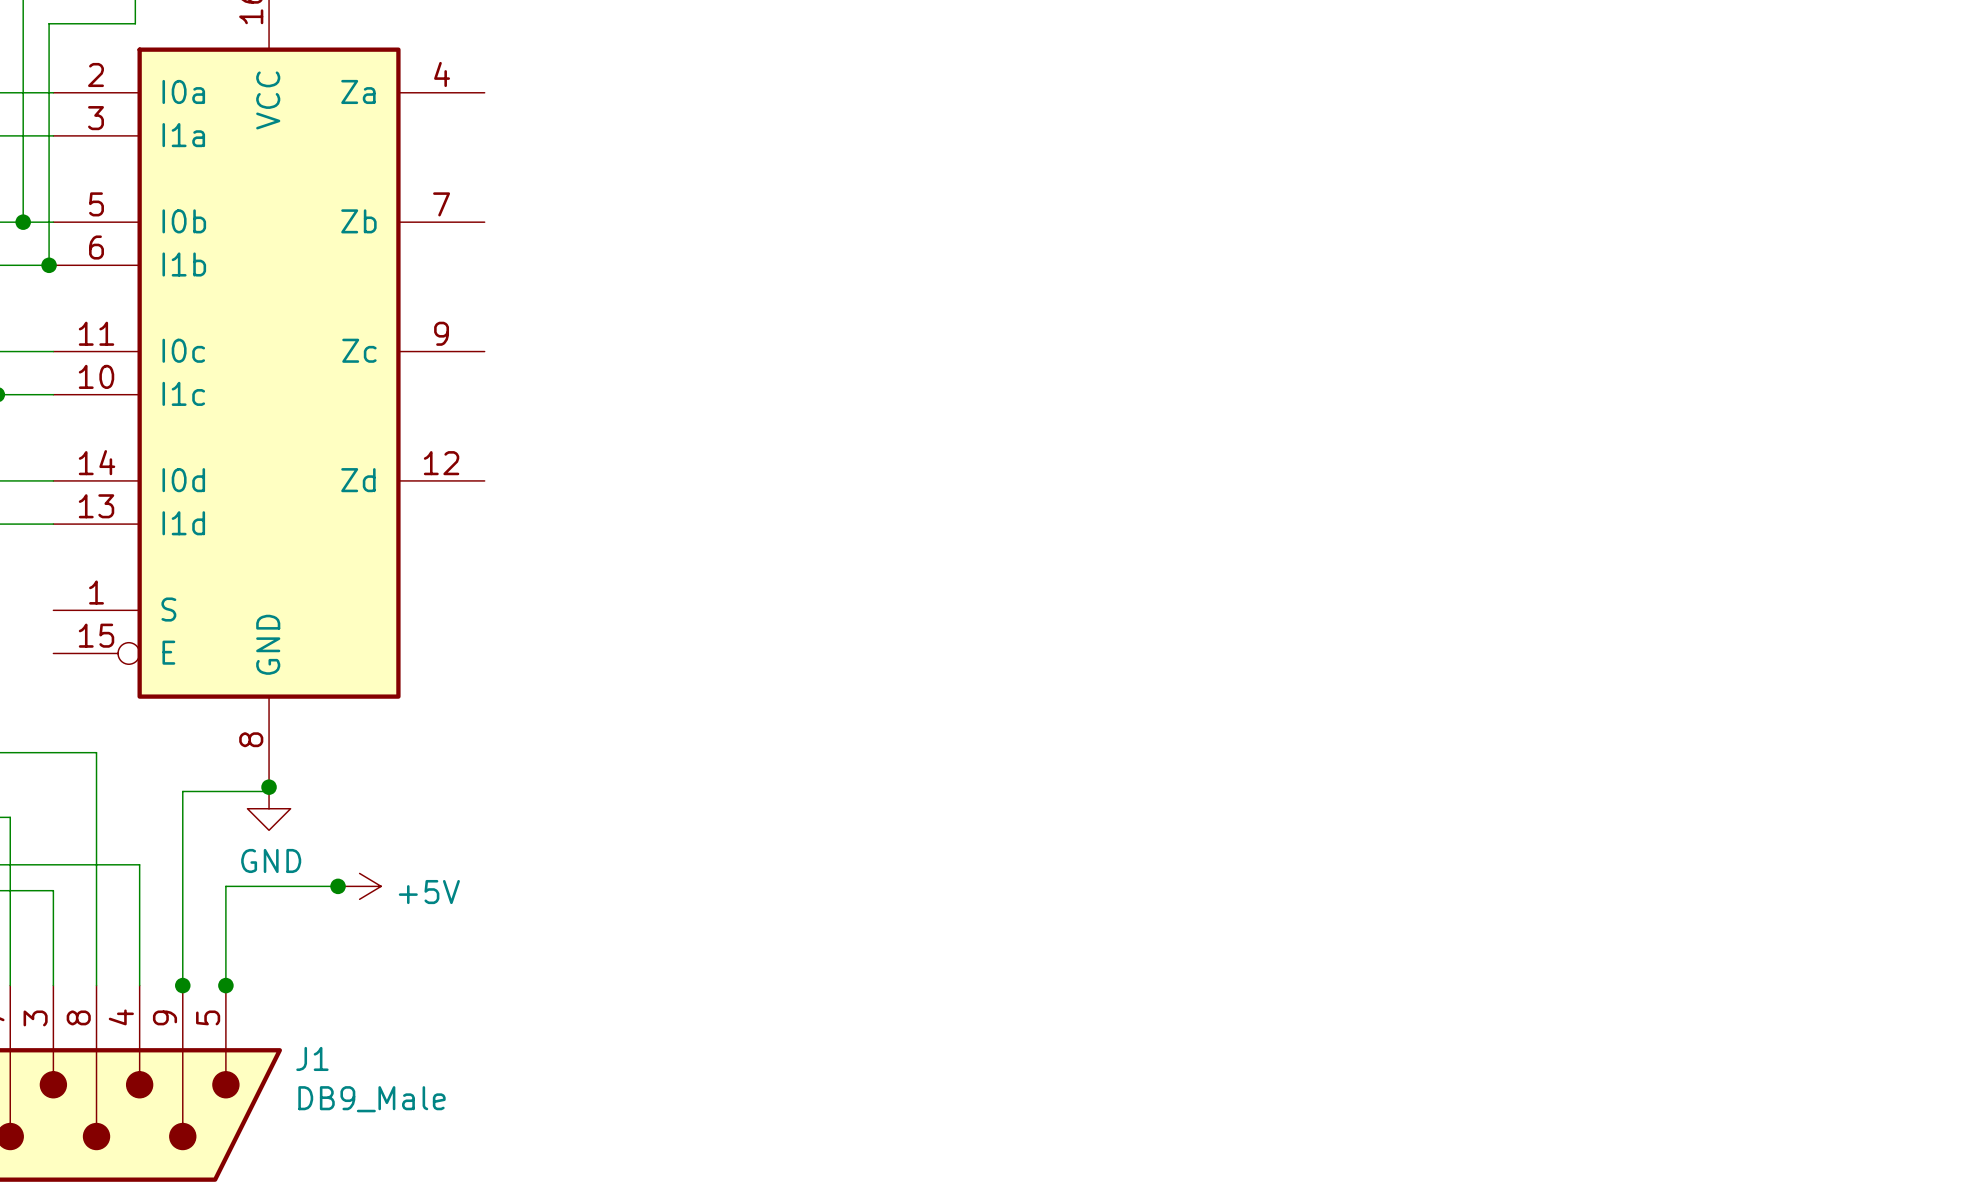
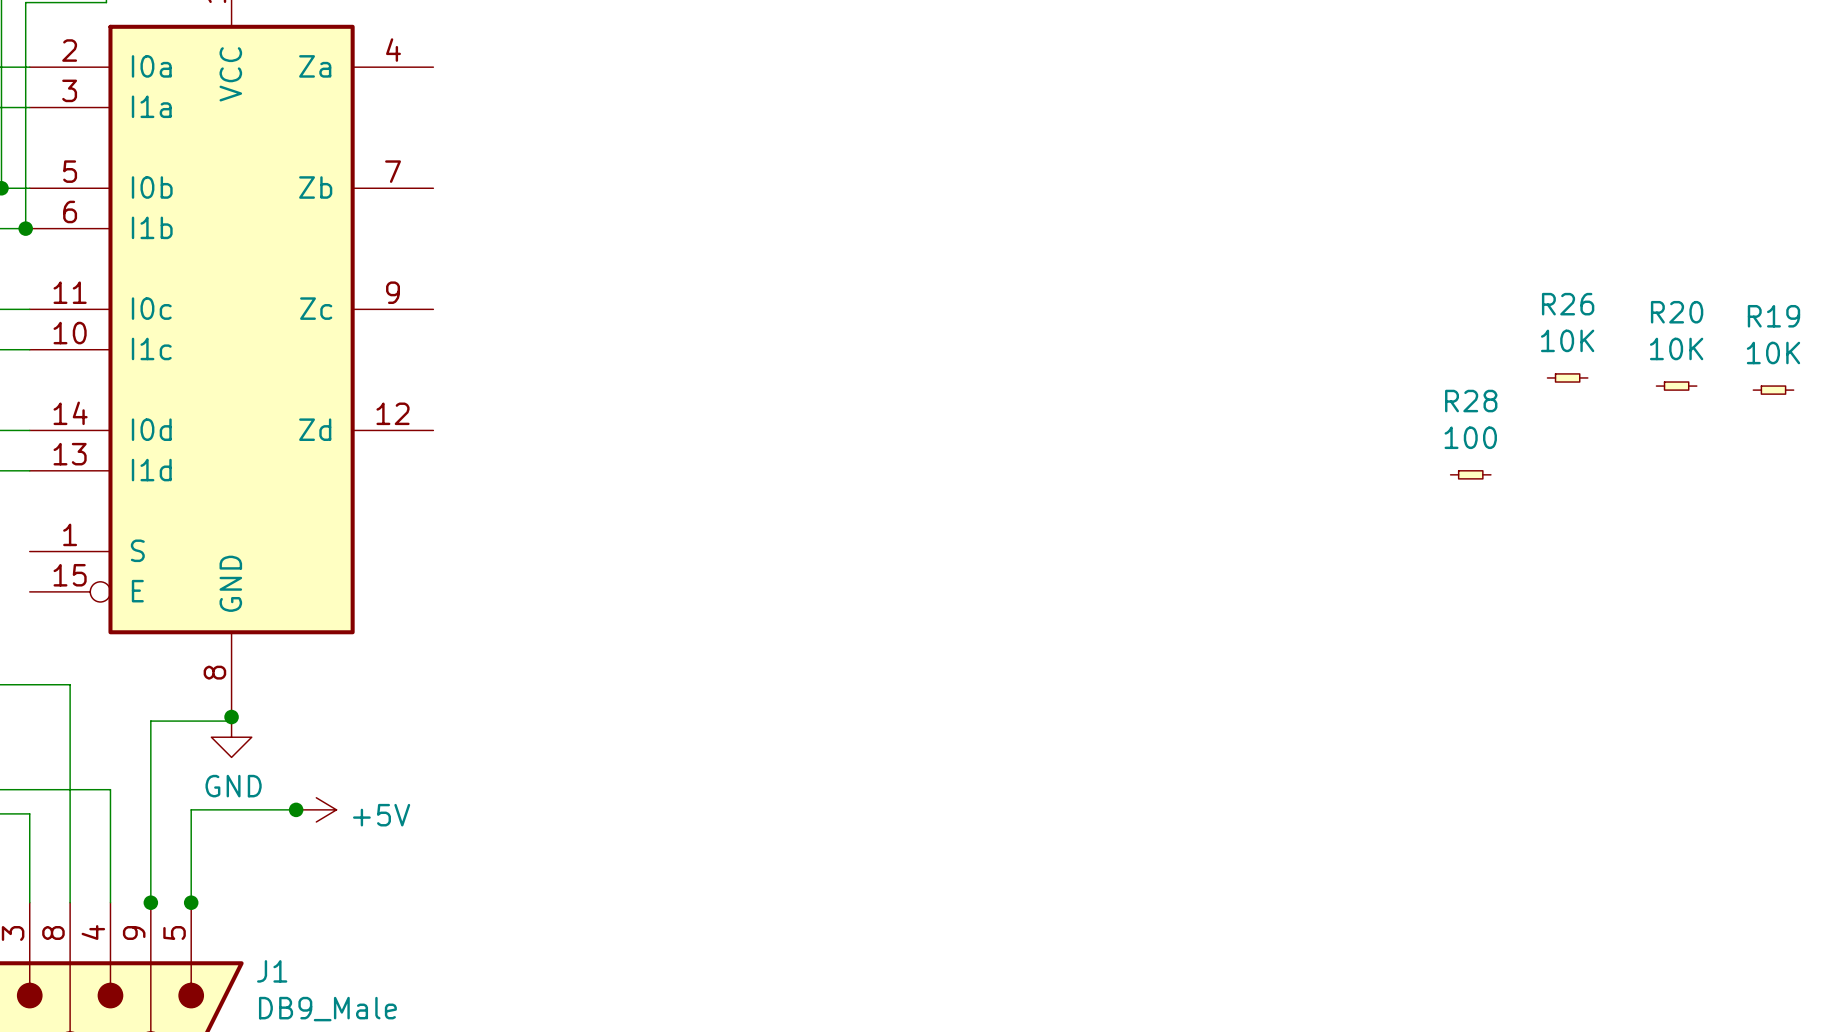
R26: none -> 10K (1567, 377)
R20: none -> 10K (1676, 386)
R19: none -> 10K (1773, 390)
R28: none -> 100 (1470, 474)

